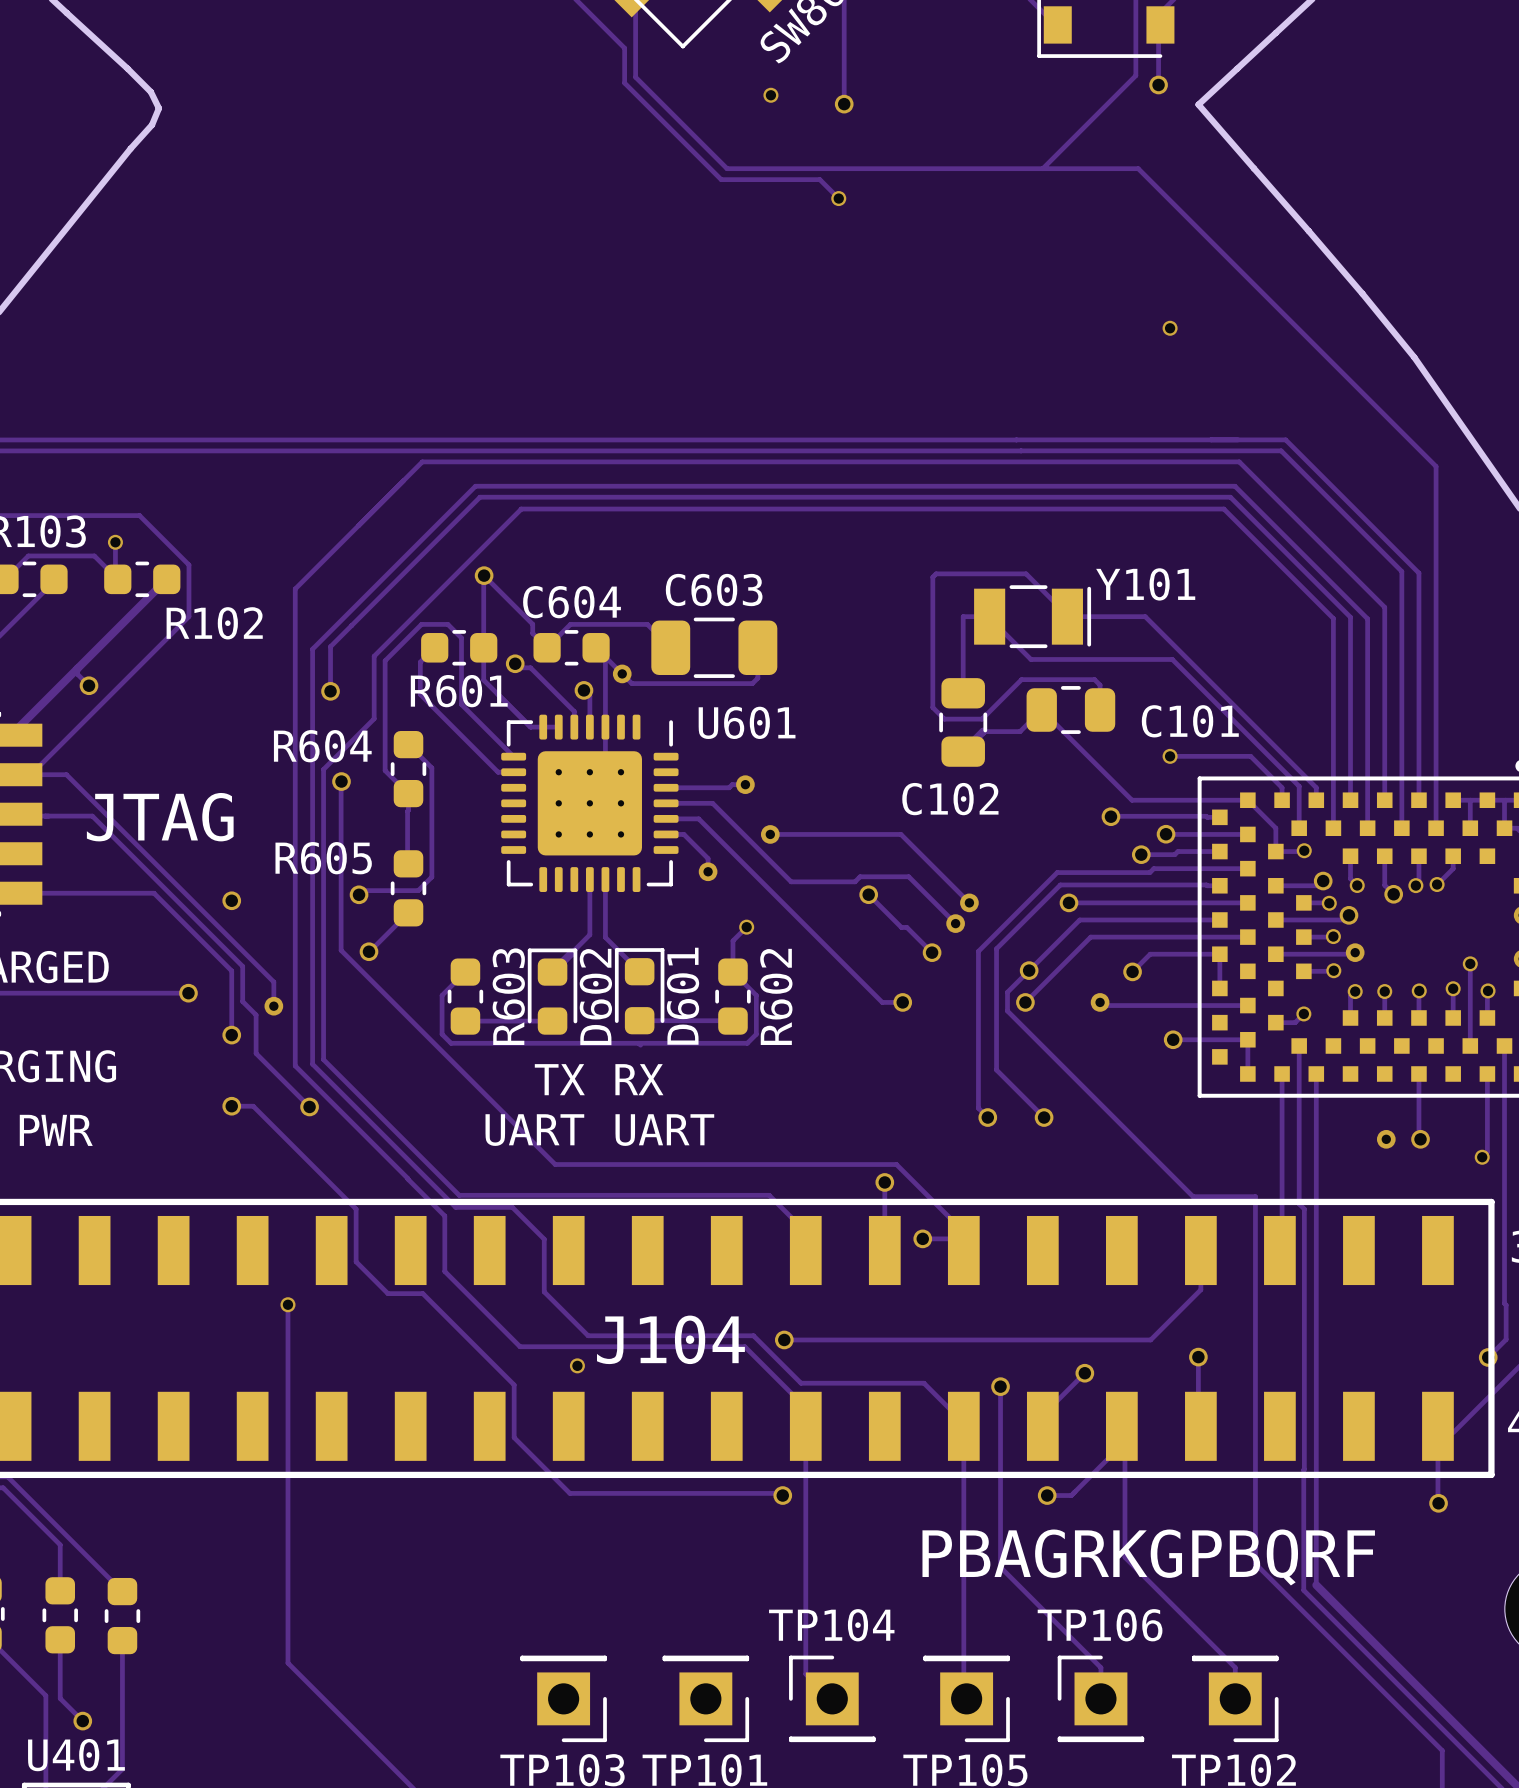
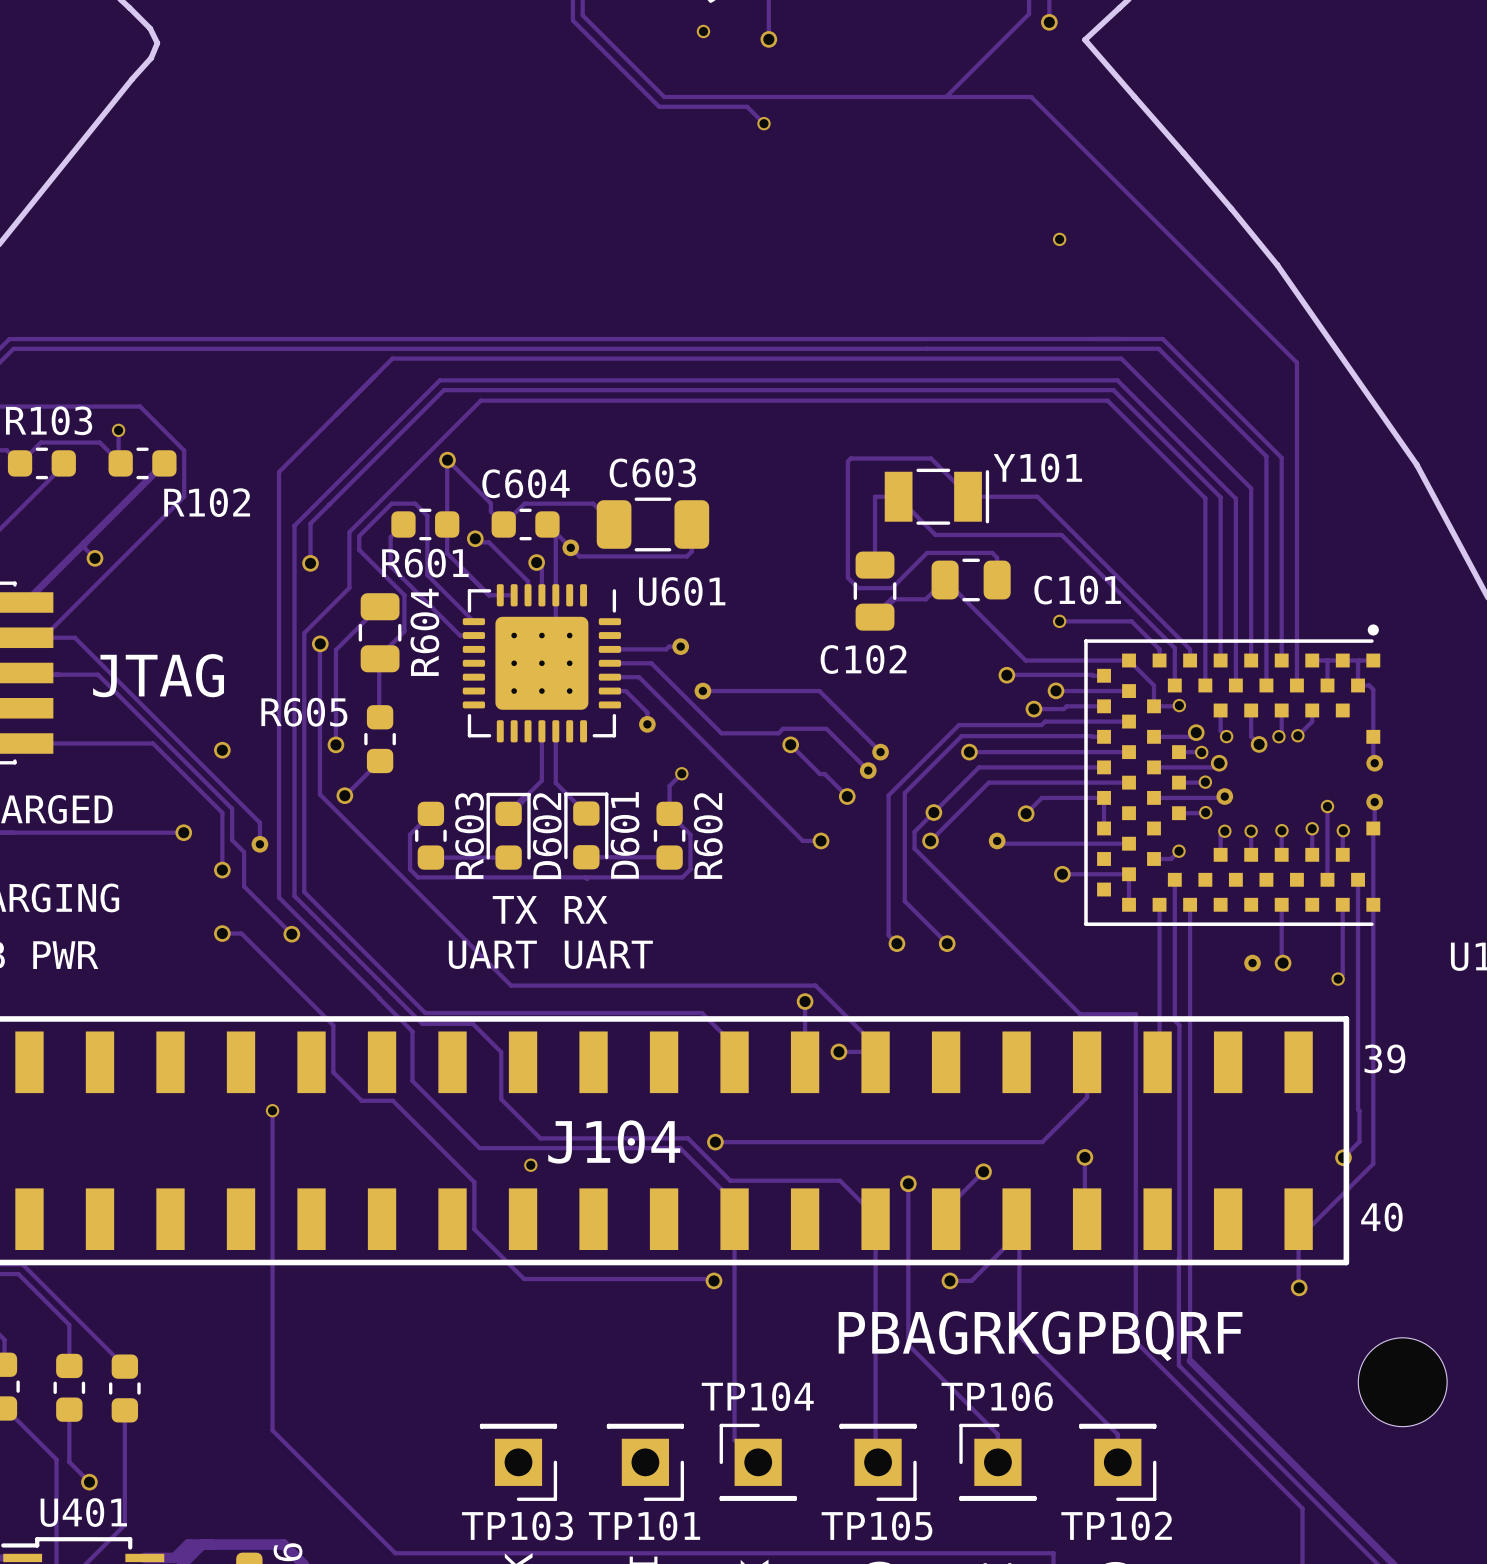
track: (385, 676) (385, 770) (408, 794) -> (359, 549) (404, 595) (404, 631) (381, 654)
R604 footprint: [390, 731, 427, 808] -> [358, 593, 402, 673]
track: none -> (378, 607) (335, 649) (335, 744)
track: (408, 744) (431, 767) (431, 877) (418, 890) (363, 890) -> none
R604 name rotation: 0° (322, 746) -> 90° counterclockwise (424, 632)

